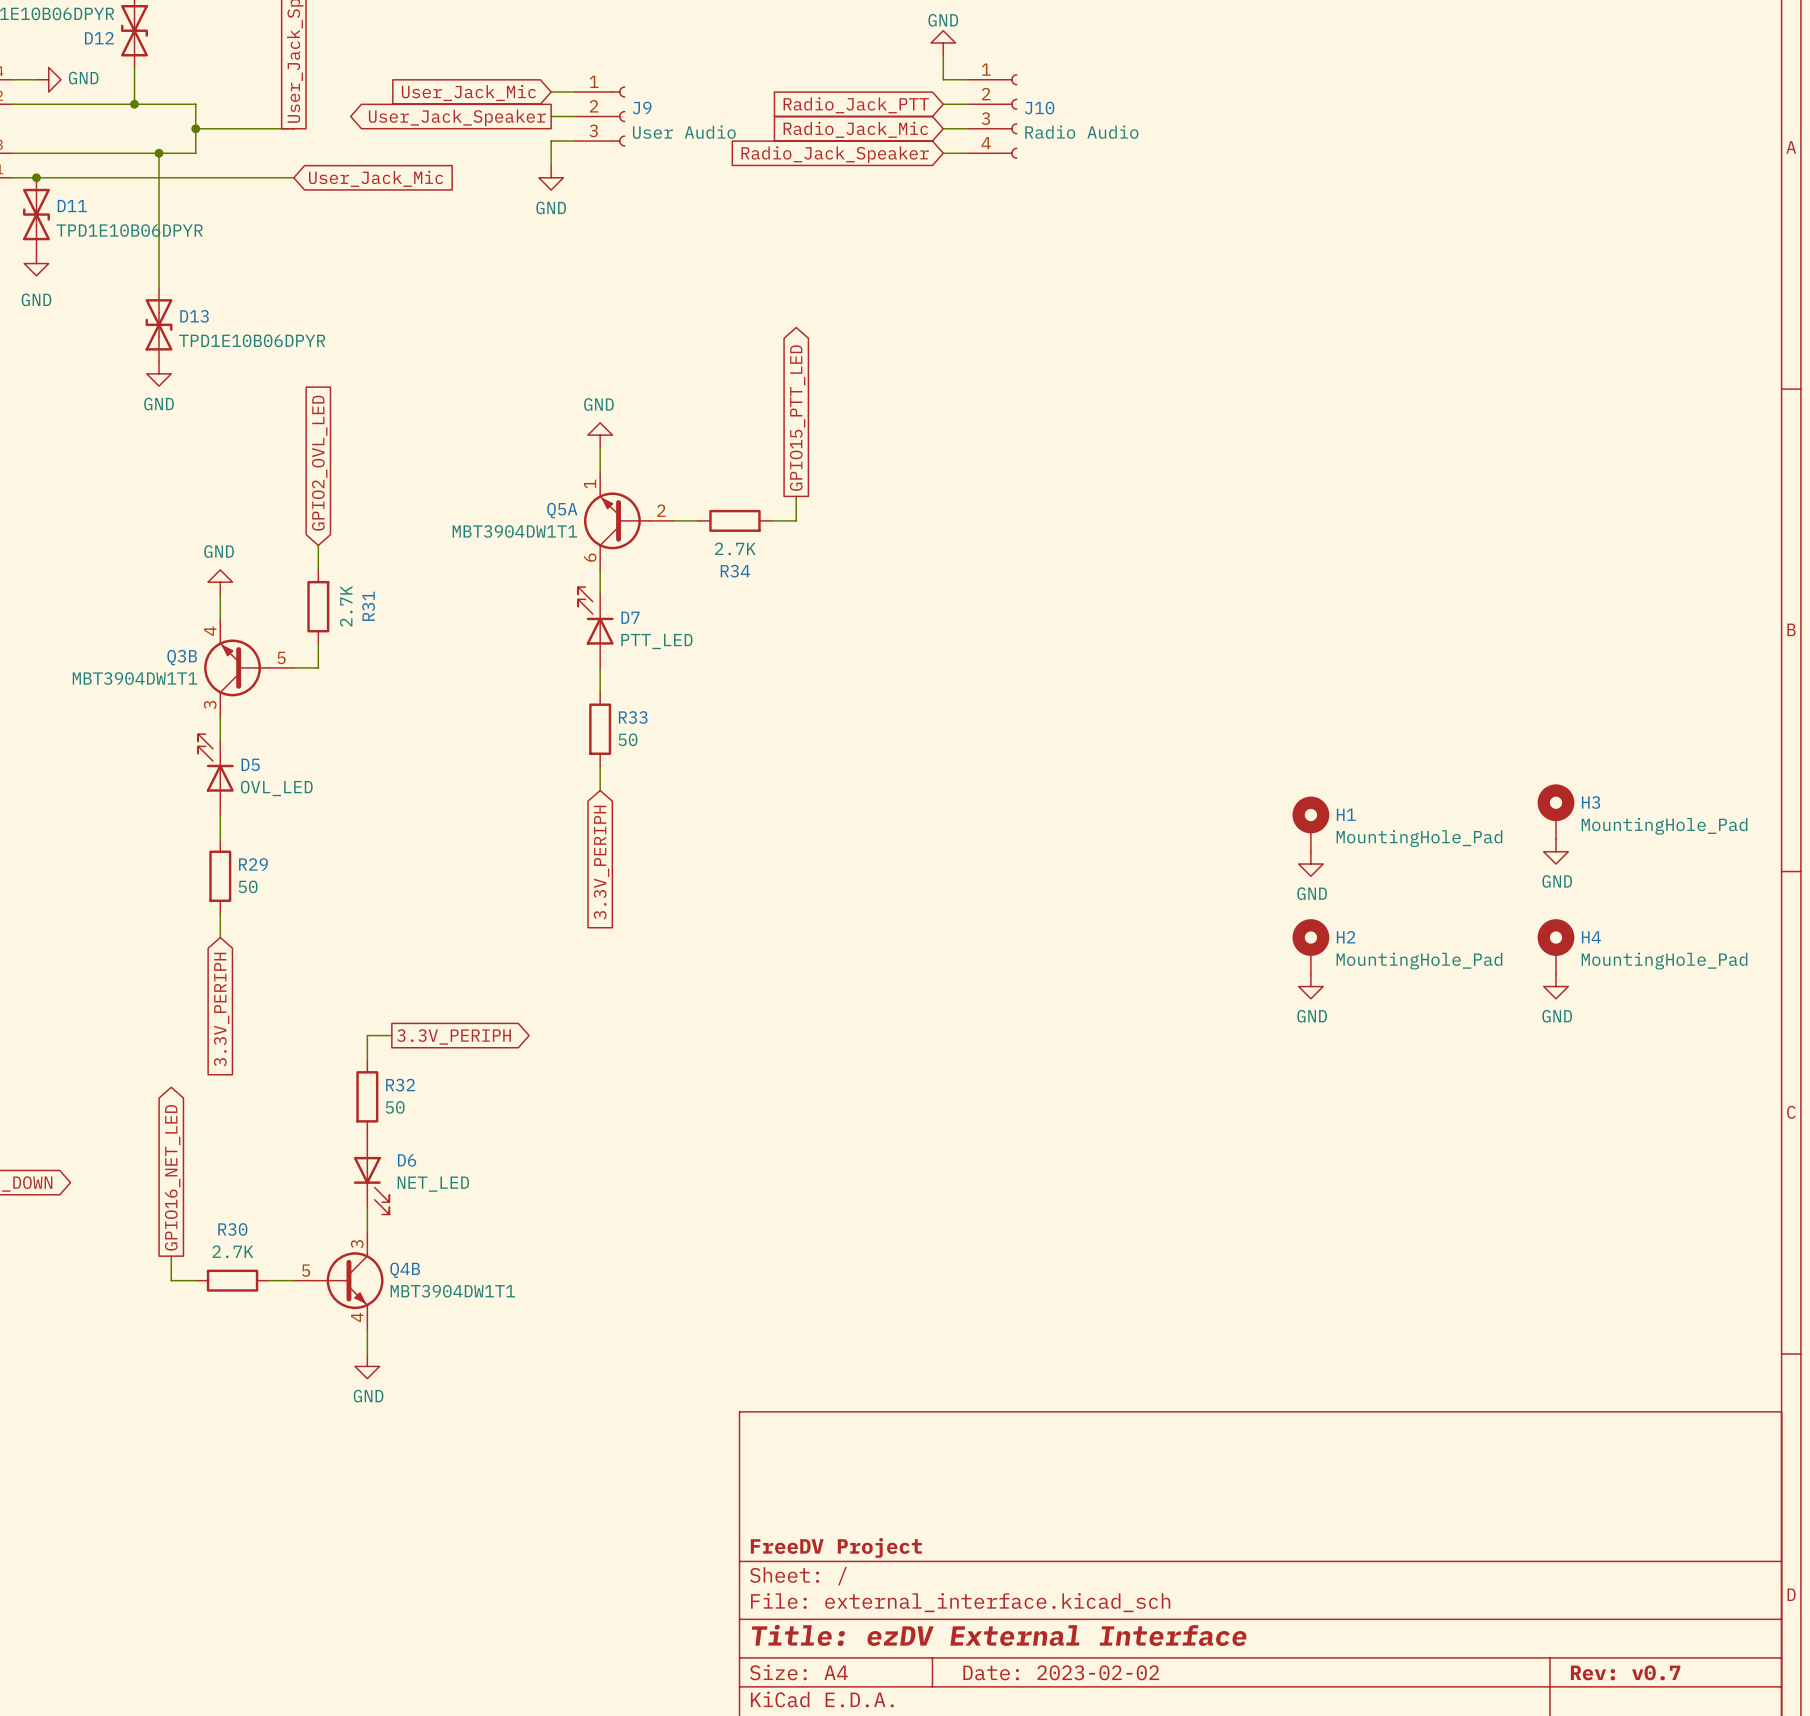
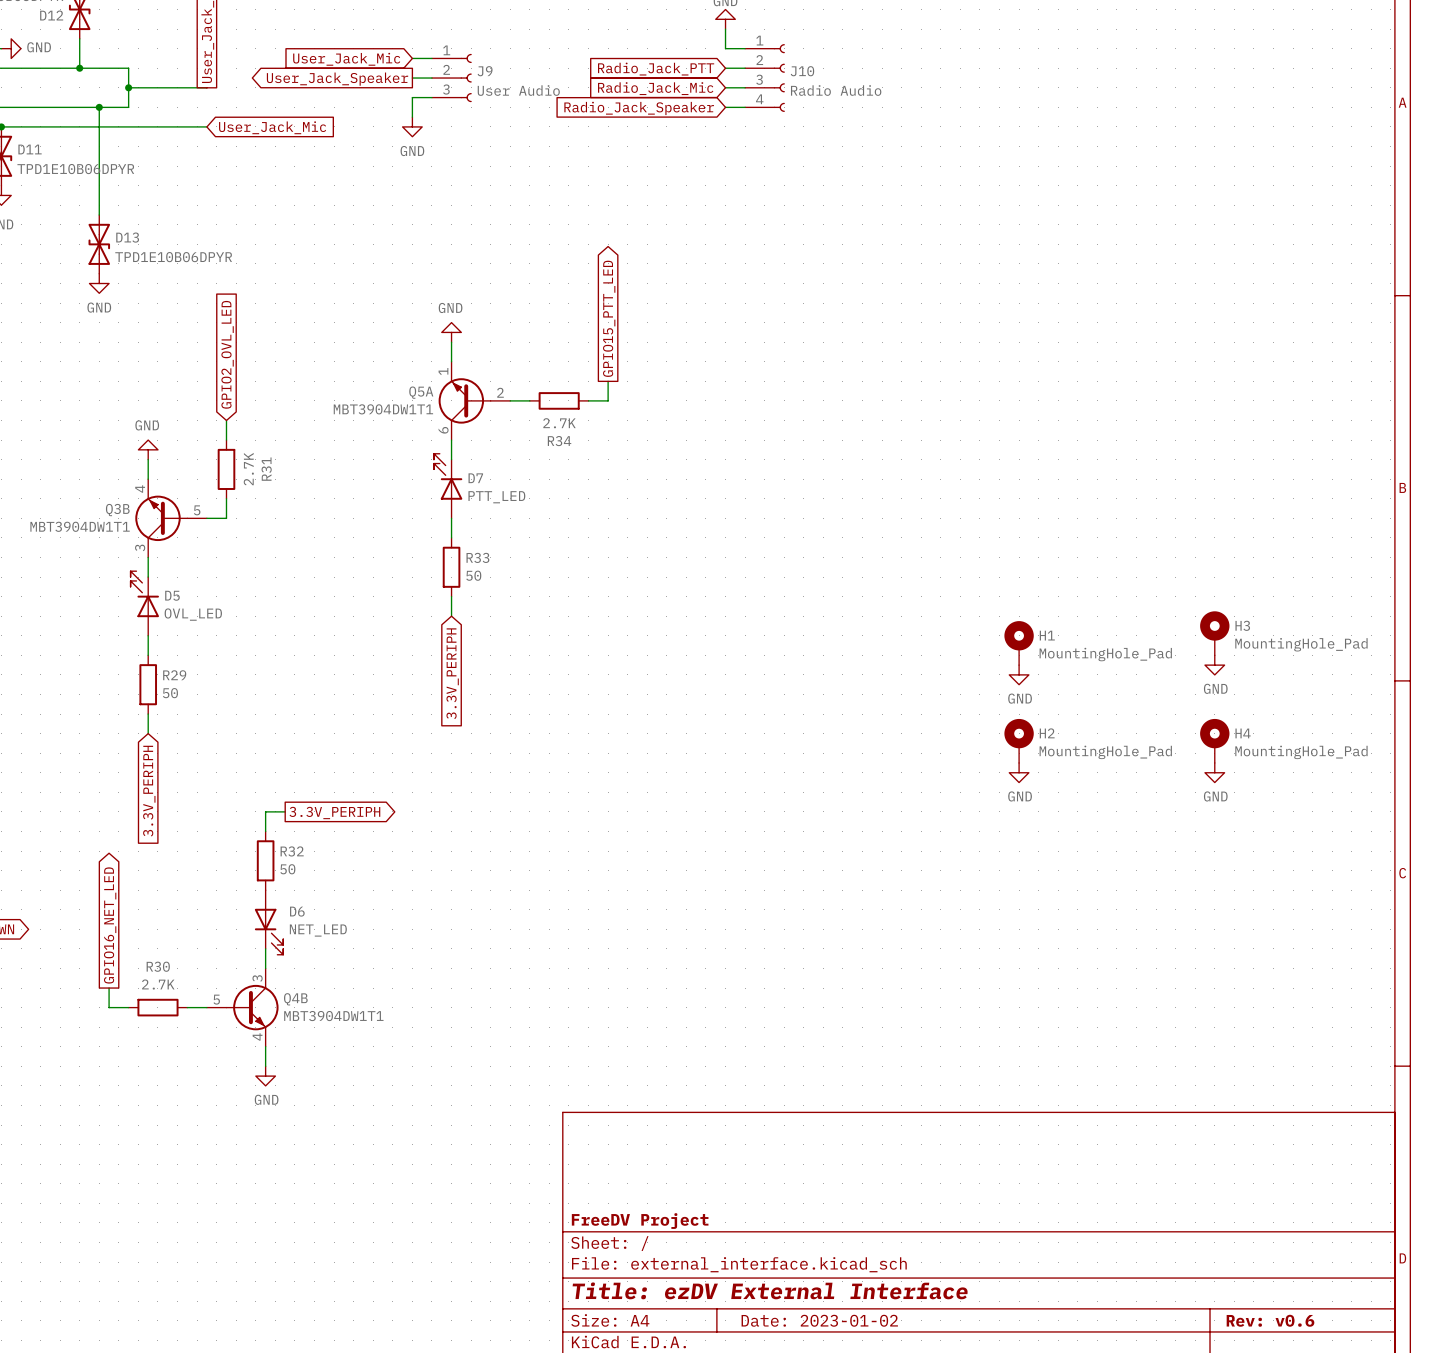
title block: Date: 2023-02-02 (1061, 1672) -> Date: 2023-01-02 (819, 1320)
title block: Rev: v0.7 (1625, 1672) -> Rev: v0.6 (1270, 1320)

